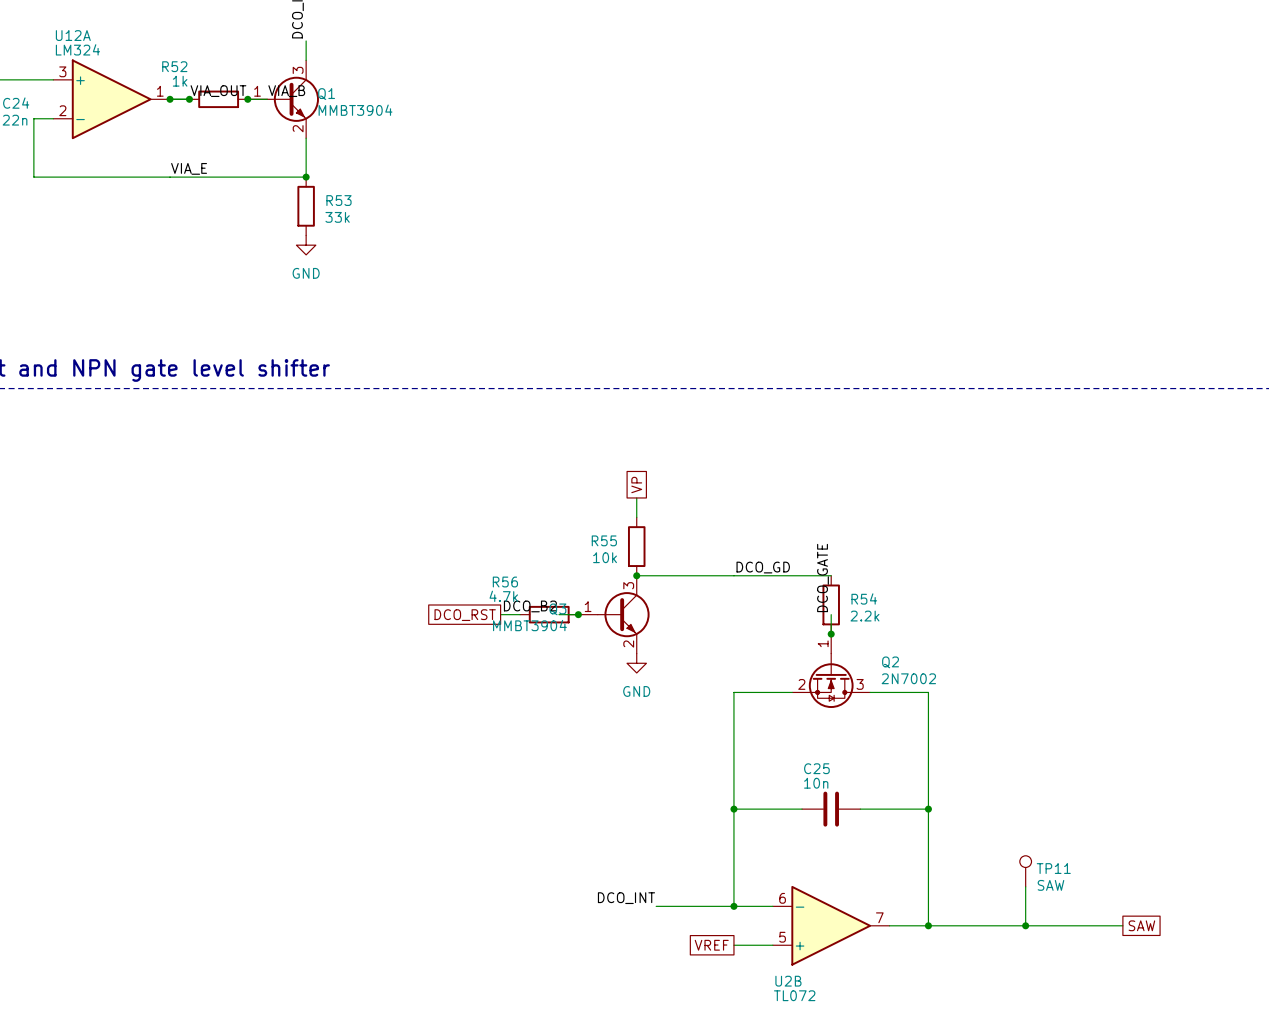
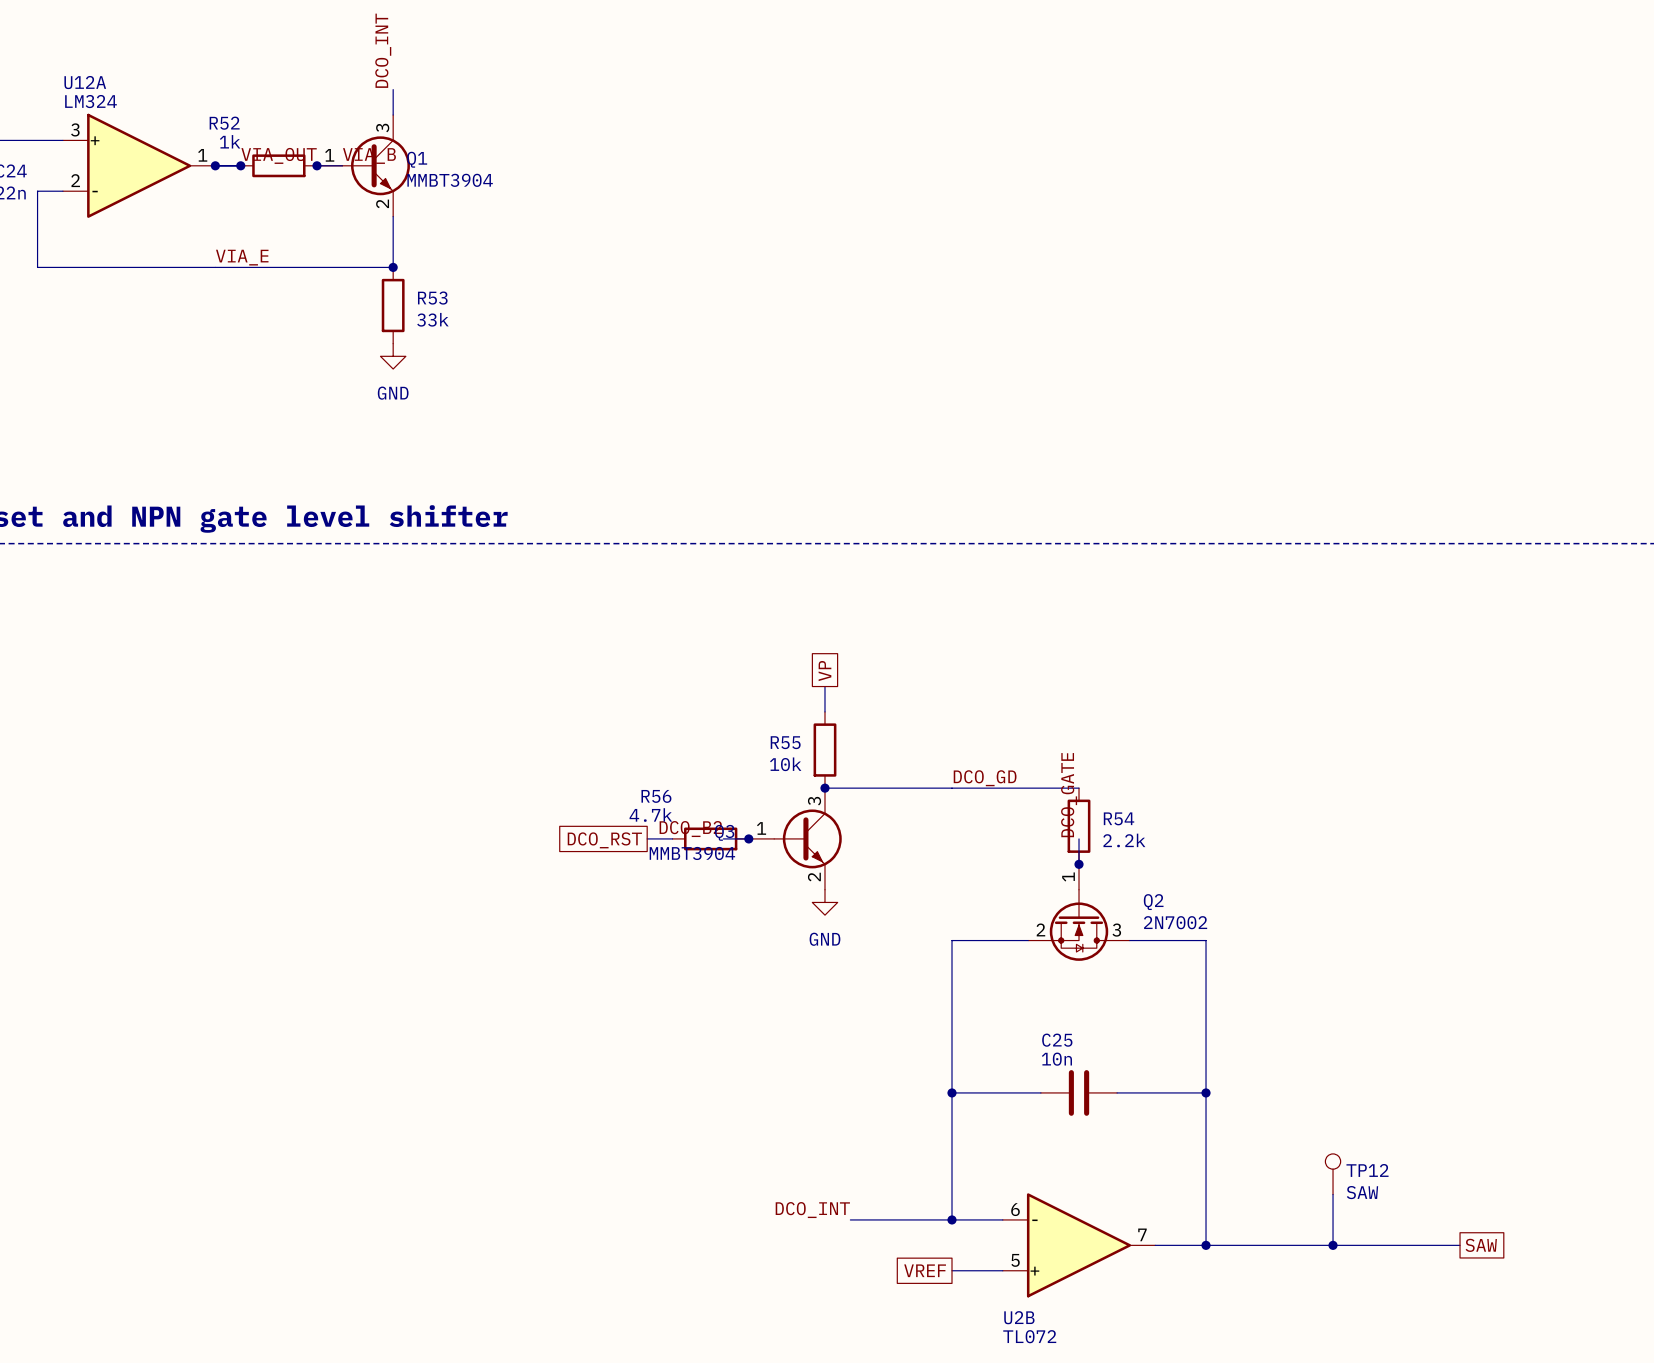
TP11 name: TP11 (1053, 868) -> TP12 (1367, 1170)

